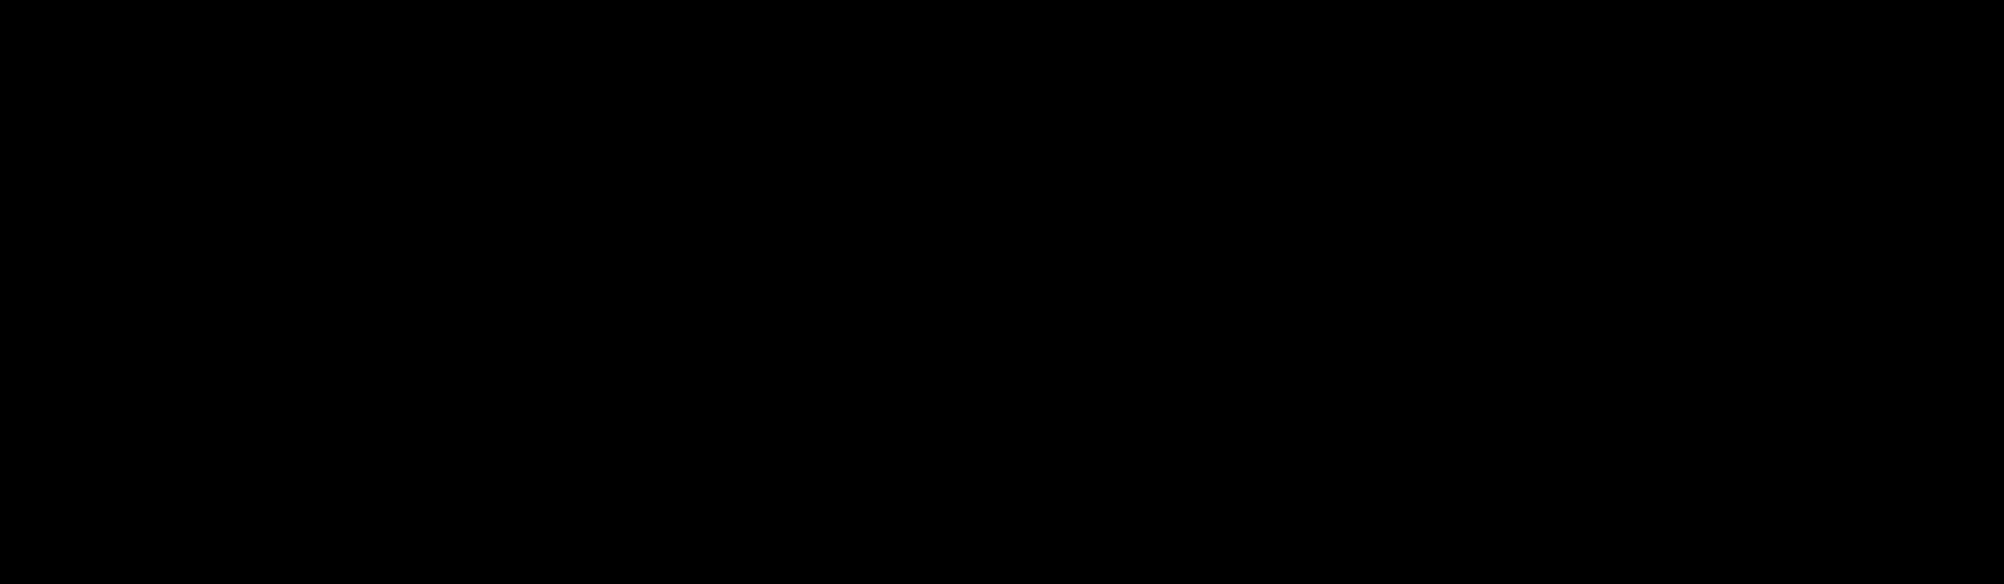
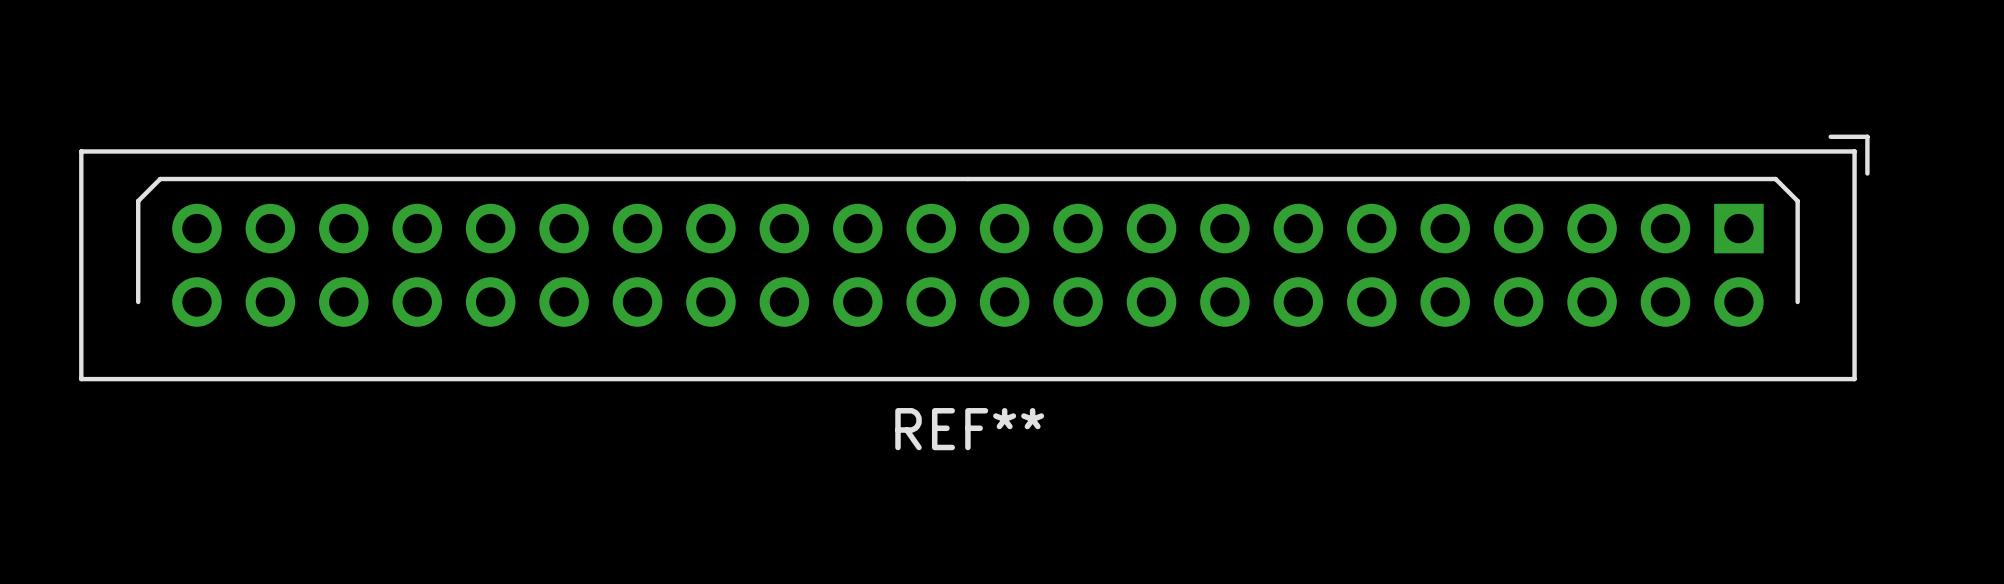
REF**: none -> (974, 257)

